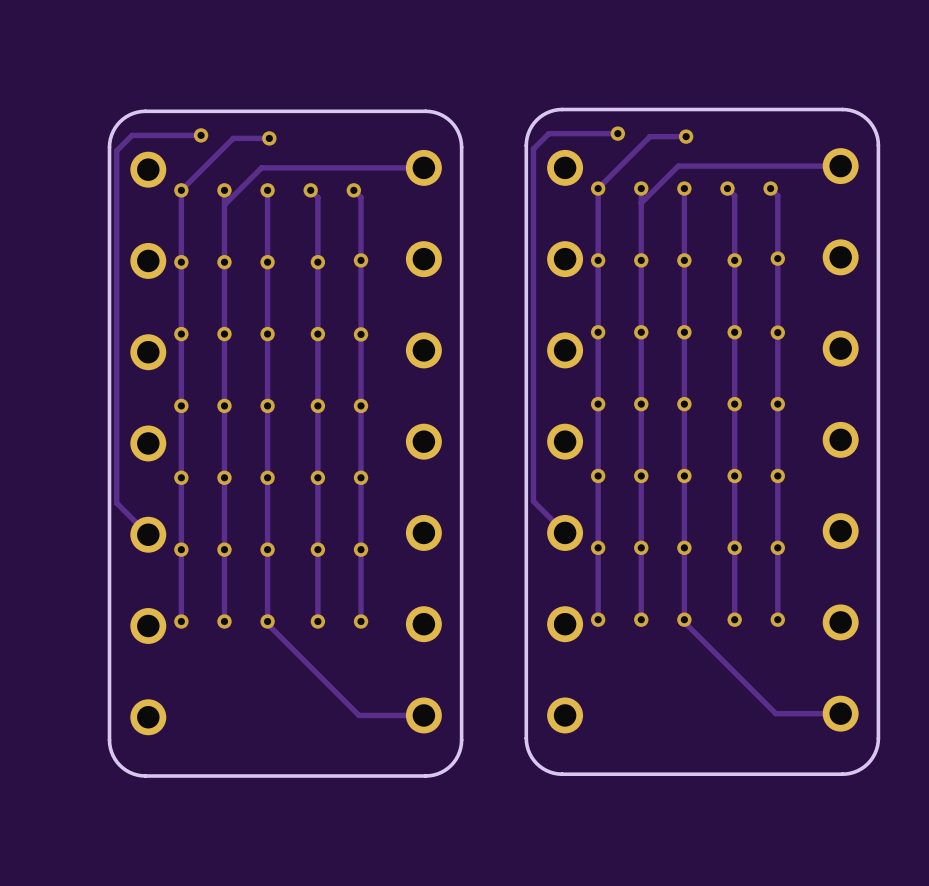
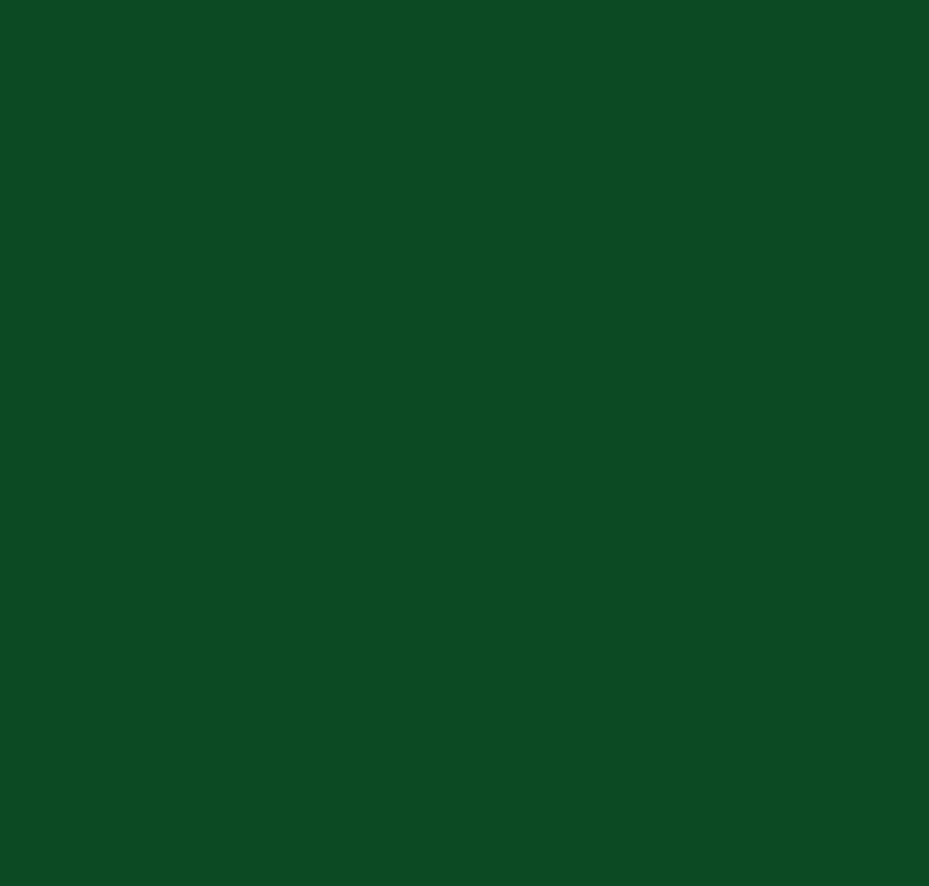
board edge: (842, 109) (558, 109) (539, 117) (529, 129) (526, 145) (526, 738) (531, 757) (546, 770) (562, 774) (842, 774) (861, 768) (874, 753) (878, 738) (878, 145) (874, 129) (867, 120) (854, 111) (842, 109) -> none
board edge: (425, 111) (141, 111) (126, 116) (113, 131) (109, 147) (109, 740) (115, 759) (129, 772) (145, 776) (425, 776) (444, 770) (458, 755) (461, 740) (461, 147) (458, 131) (451, 121) (437, 113) (425, 111) -> none
track: (617, 133) (548, 133) (533, 149) (533, 501) (565, 532) -> none
via: (617, 133) -> none
track: (201, 135) (132, 135) (116, 150) (116, 503) (148, 534) -> none
via: (201, 135) -> none
track: (686, 136) (650, 136) (598, 188) (598, 619) -> none
via: (686, 136) -> none
track: (269, 138) (233, 138) (181, 190) (181, 621) -> none
via: (269, 138) -> none
track: (840, 166) (678, 166) (641, 203) -> none
track: (423, 167) (261, 167) (224, 204) -> none
via: (598, 188) -> none
track: (641, 188) (641, 619) -> none
via: (641, 188) -> none
track: (684, 188) (684, 622) (775, 713) (840, 713) -> none
via: (684, 188) -> none
track: (727, 188) (734, 195) (734, 619) -> none
via: (727, 188) -> none
track: (770, 188) (777, 195) (777, 619) -> none
via: (770, 188) -> none
via: (181, 190) -> none
track: (224, 190) (224, 621) -> none
via: (224, 190) -> none
track: (267, 190) (267, 624) (359, 715) (423, 715) -> none
via: (267, 190) -> none
track: (310, 190) (317, 197) (317, 621) -> none
via: (310, 190) -> none
track: (353, 190) (361, 197) (361, 621) -> none
via: (353, 190) -> none
via: (777, 258) -> none
via: (361, 260) -> none
via: (598, 260) -> none
via: (641, 260) -> none
via: (684, 260) -> none
via: (734, 260) -> none
via: (181, 262) -> none
via: (224, 262) -> none
via: (267, 262) -> none
via: (317, 262) -> none
via: (598, 332) -> none
via: (641, 332) -> none
via: (684, 332) -> none
via: (734, 332) -> none
via: (777, 332) -> none
via: (181, 334) -> none
via: (224, 334) -> none
via: (267, 334) -> none
via: (317, 334) -> none
via: (361, 334) -> none
via: (598, 404) -> none
via: (641, 404) -> none
via: (684, 404) -> none
via: (734, 404) -> none
via: (777, 404) -> none
via: (181, 405) -> none
via: (224, 405) -> none
via: (267, 405) -> none
via: (317, 405) -> none
via: (361, 405) -> none
part: (840, 439) -> none
part: (423, 441) -> none
part: (565, 441) -> none
part: (148, 443) -> none
via: (598, 475) -> none
via: (641, 475) -> none
via: (684, 475) -> none
via: (734, 475) -> none
via: (777, 475) -> none
via: (181, 477) -> none
via: (224, 477) -> none
via: (267, 477) -> none
via: (317, 477) -> none
via: (361, 477) -> none
via: (598, 547) -> none
via: (641, 547) -> none
via: (684, 547) -> none
via: (734, 547) -> none
via: (777, 547) -> none
via: (181, 549) -> none
via: (224, 549) -> none
via: (267, 549) -> none
via: (317, 549) -> none
via: (361, 549) -> none
via: (598, 619) -> none
via: (641, 619) -> none
via: (684, 619) -> none
via: (734, 619) -> none
via: (777, 619) -> none
via: (181, 621) -> none
via: (224, 621) -> none
via: (267, 621) -> none
via: (317, 621) -> none
via: (361, 621) -> none

